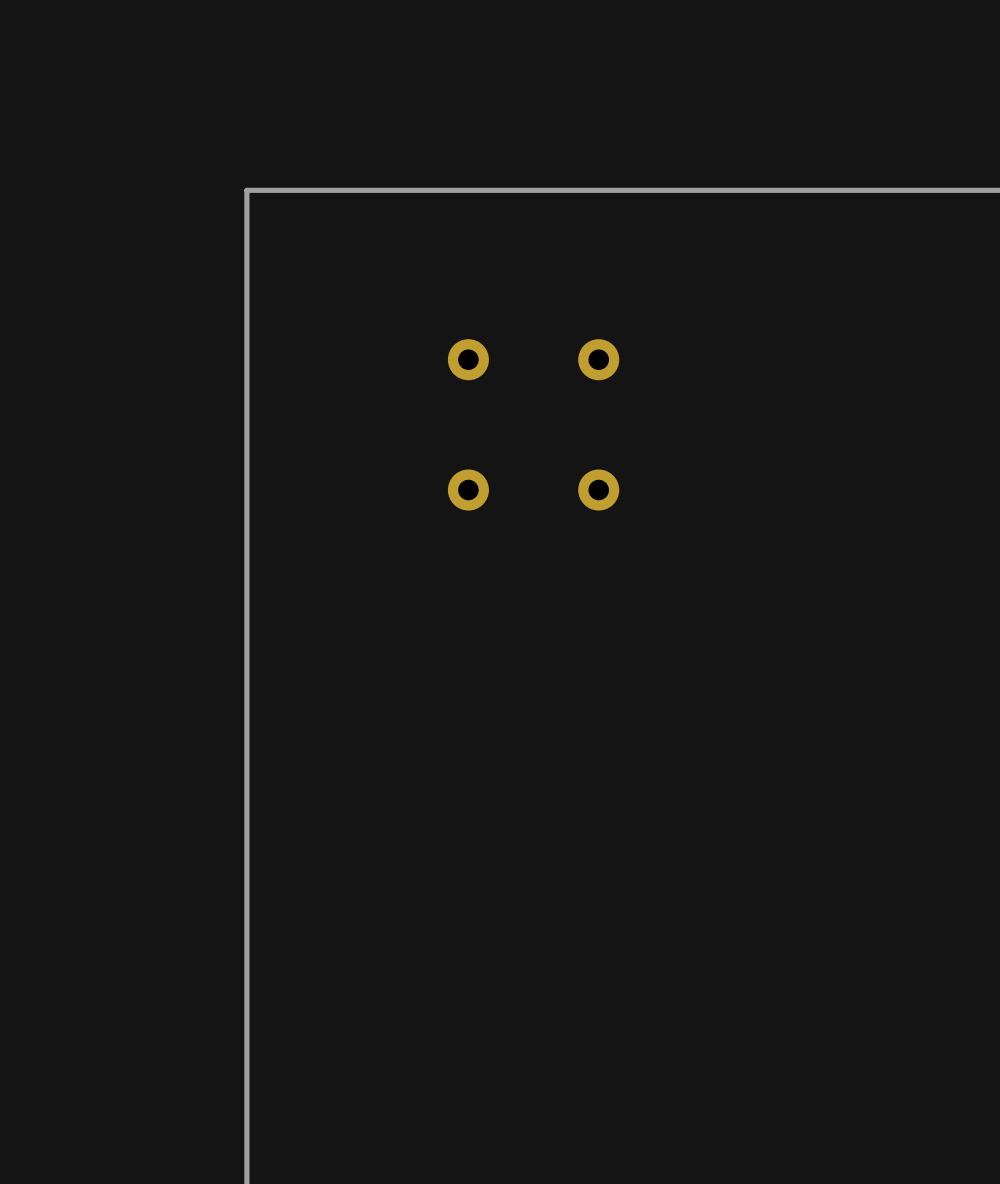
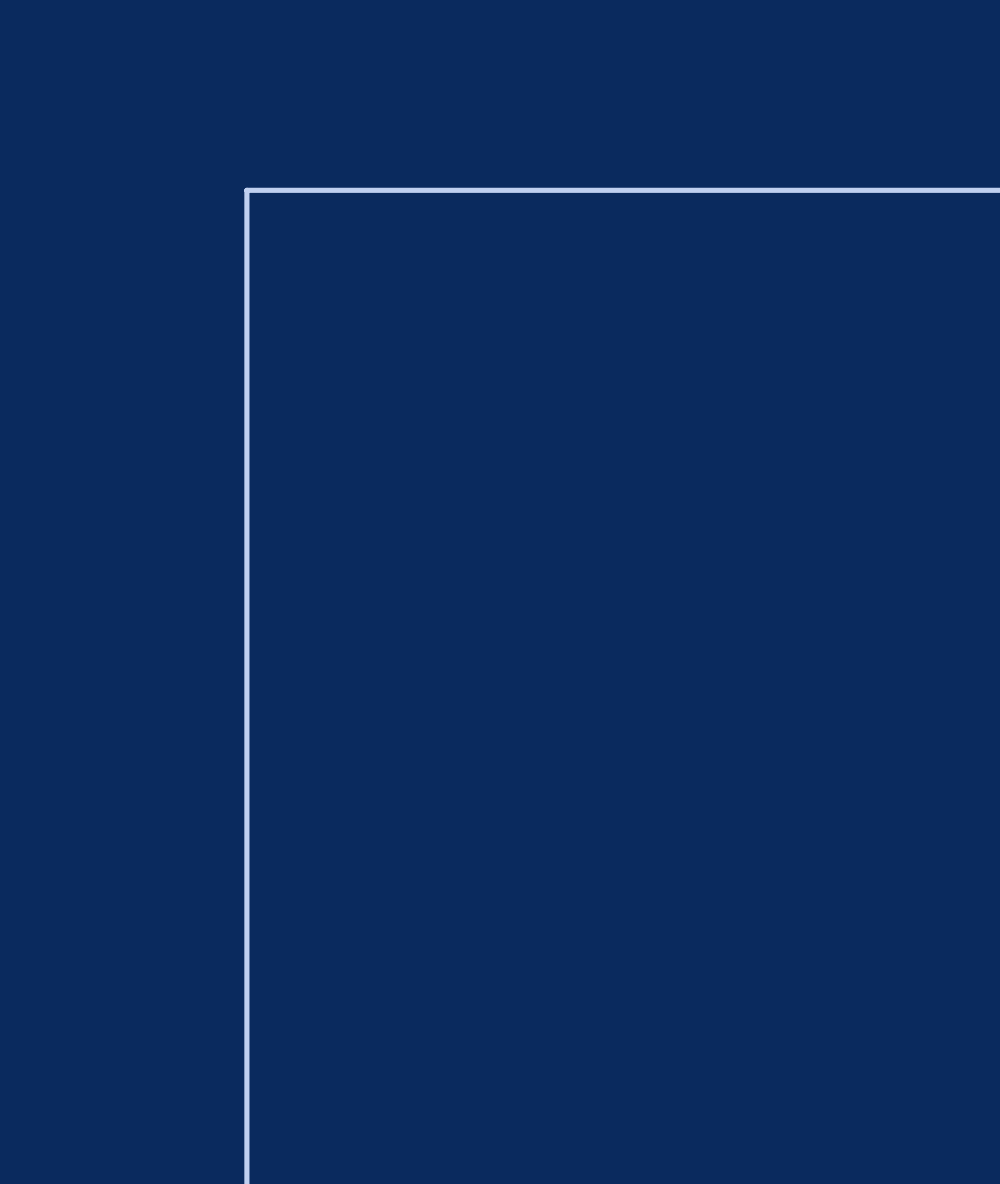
via: (468, 359) -> none
via: (598, 359) -> none
via: (468, 490) -> none
via: (598, 490) -> none

